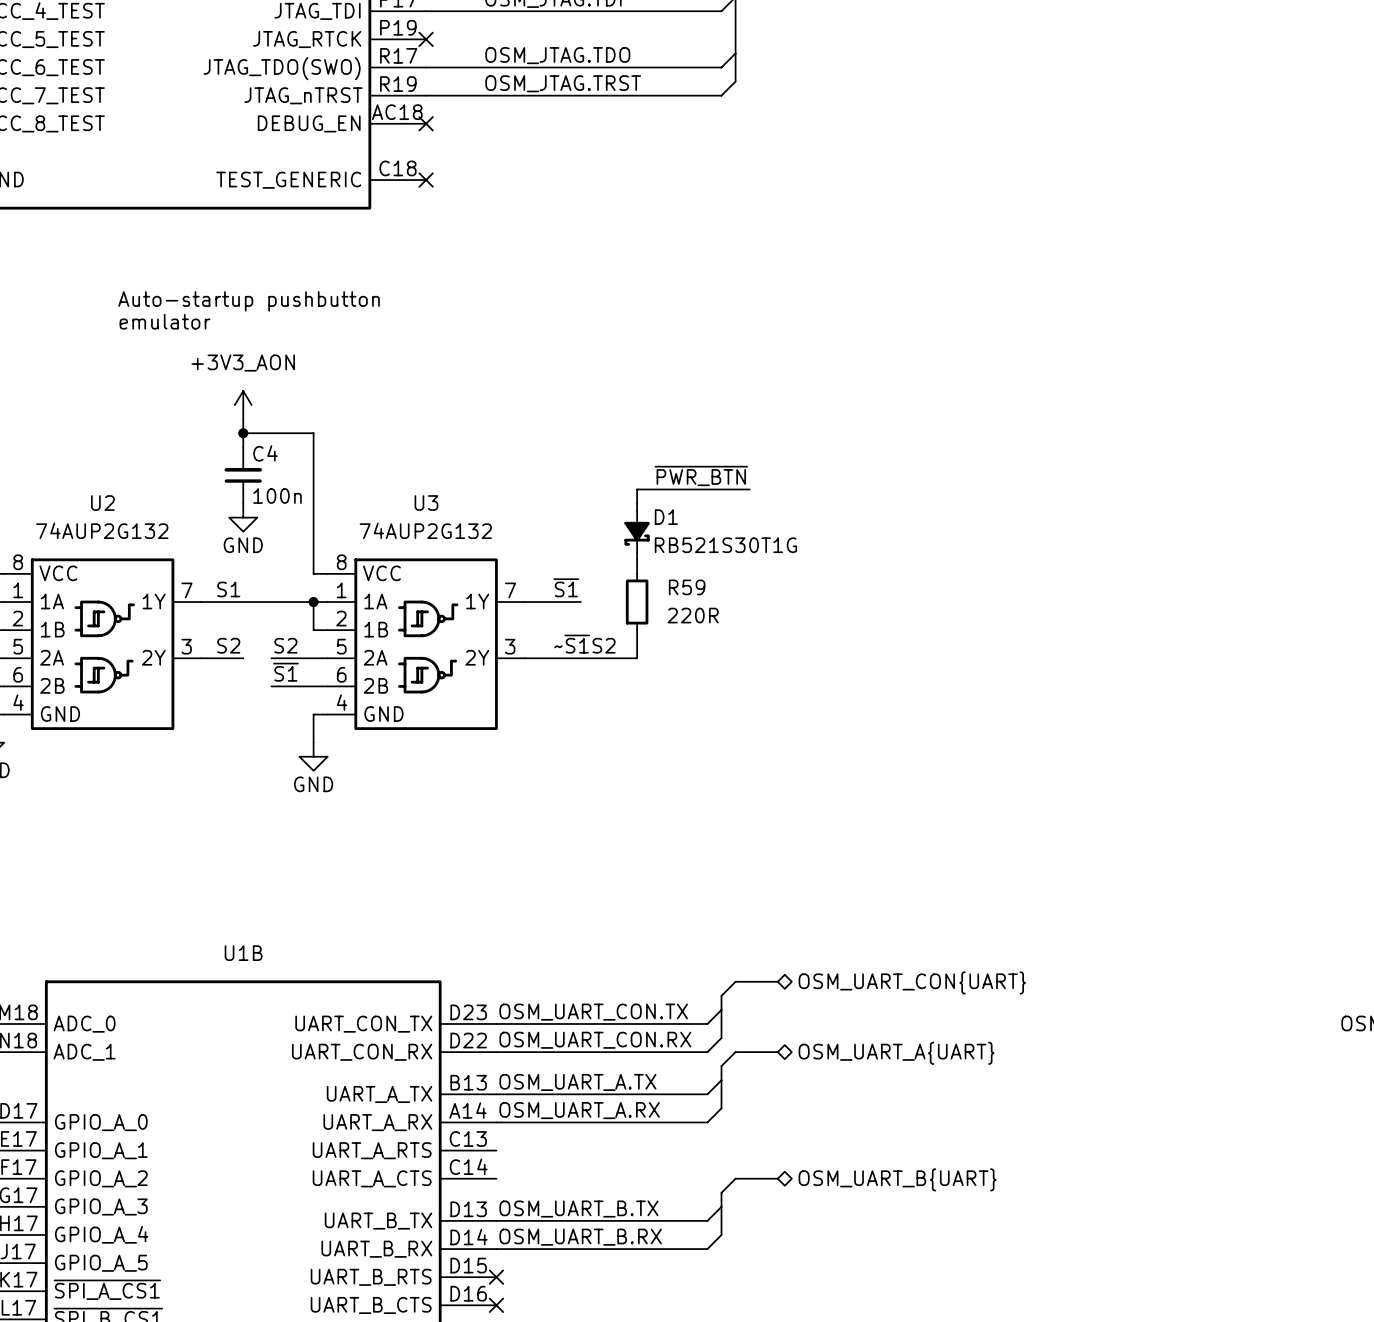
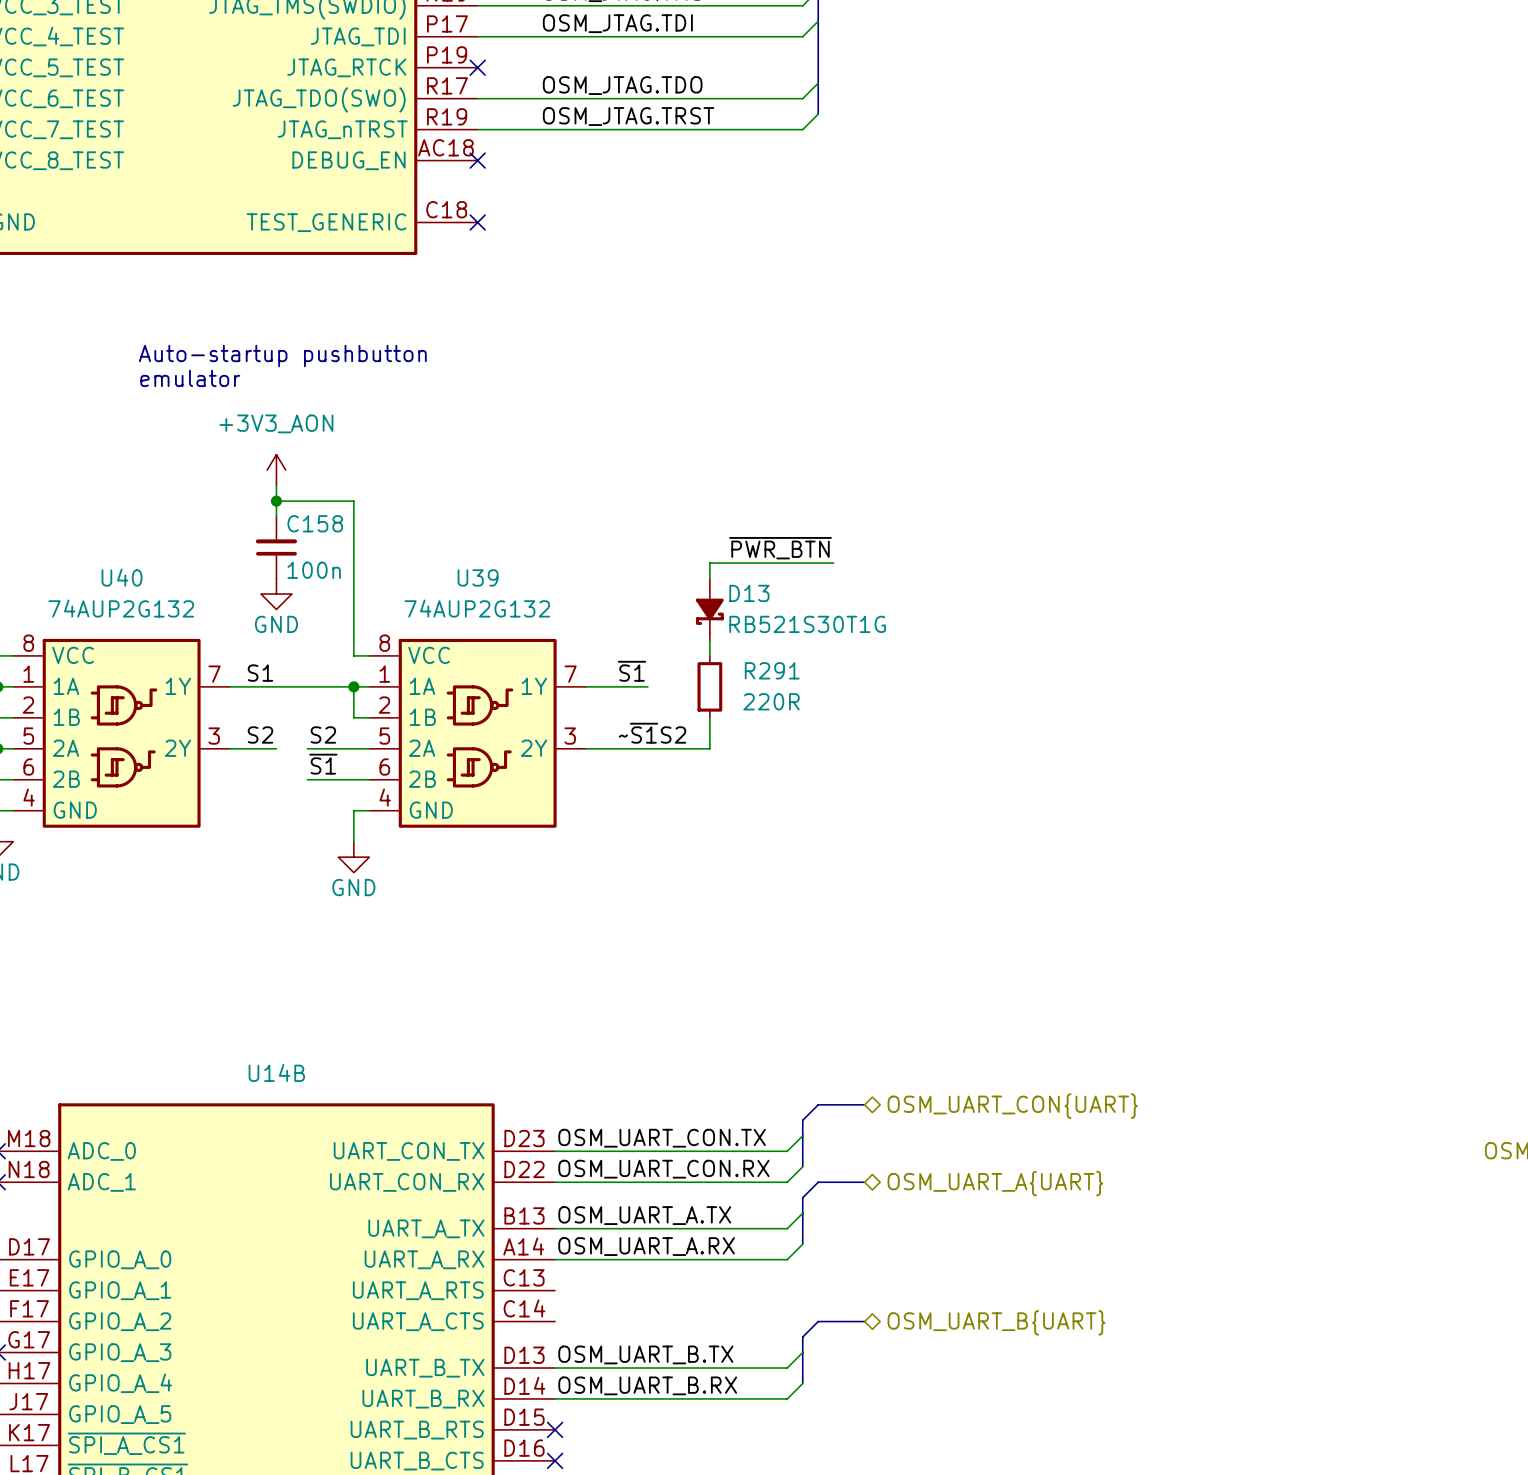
C4 name: C4 (265, 453) -> C158 (315, 523)
U2 name: U2 (102, 503) -> U40 (122, 577)
U3 name: U3 (426, 503) -> U39 (478, 577)
D1 name: D1 (666, 517) -> D13 (749, 593)
R59 name: R59 (687, 587) -> R291 (772, 670)
U1B name: U1B (243, 953) -> U14B (276, 1072)

